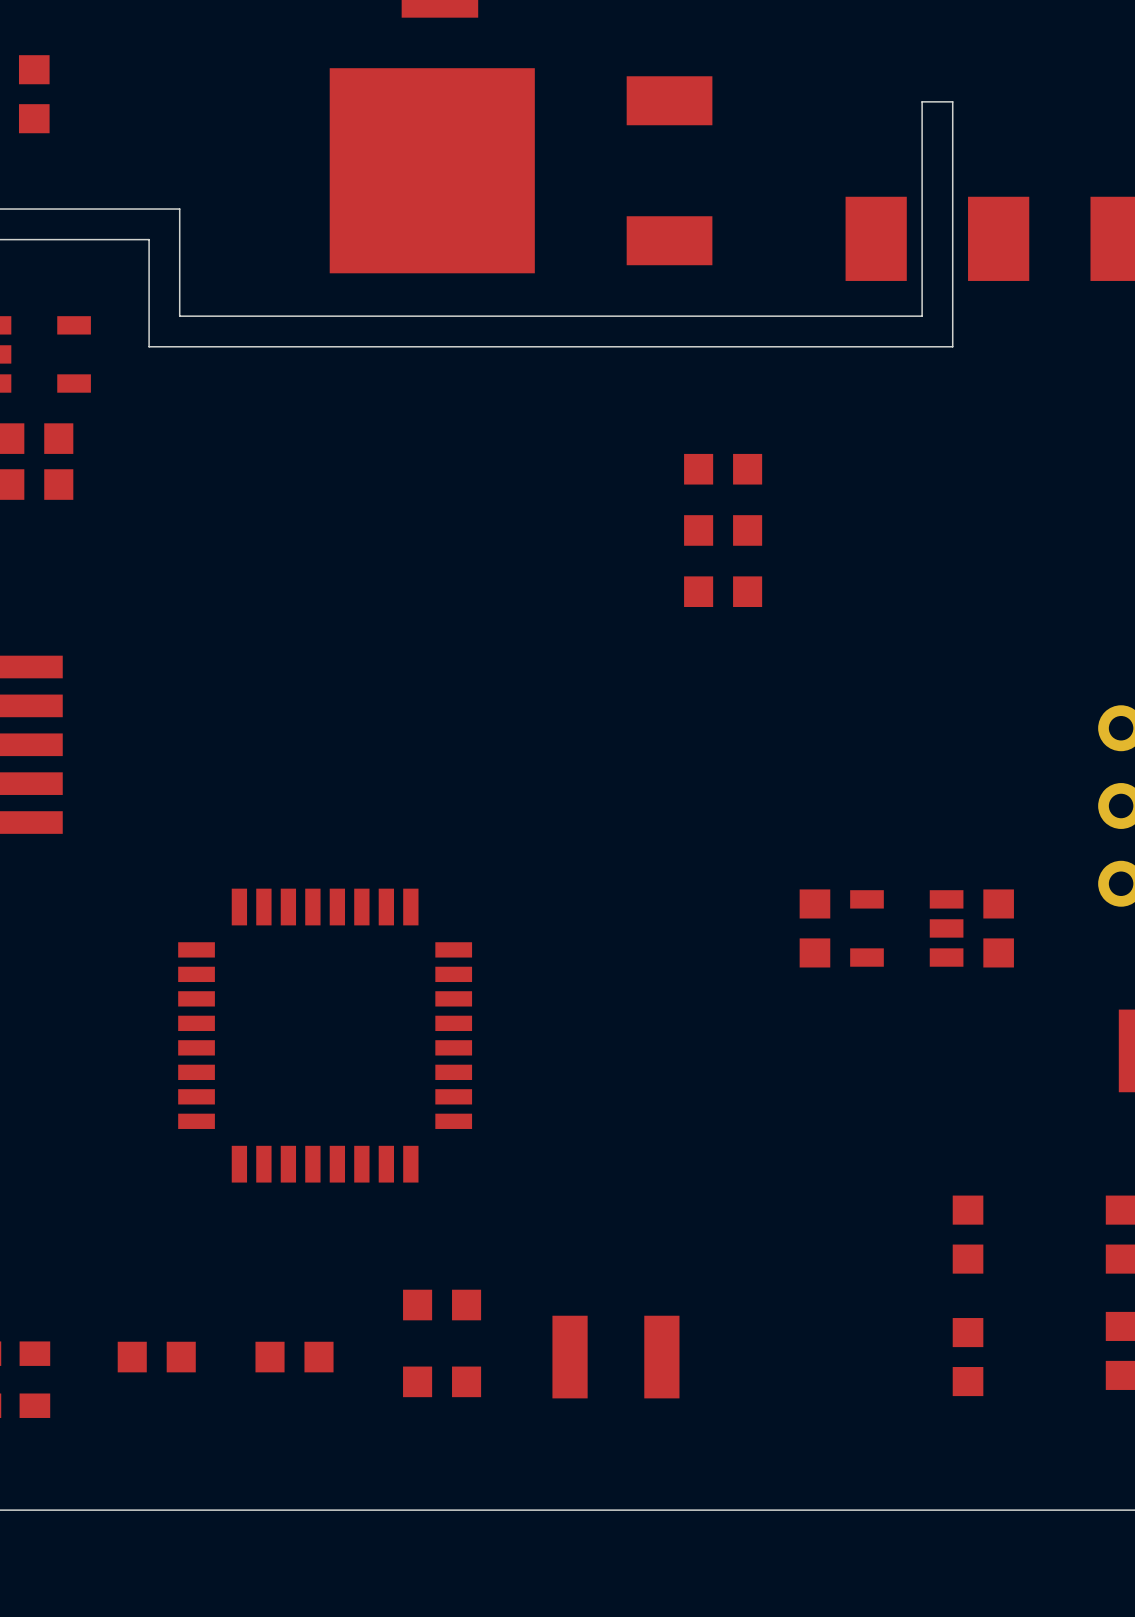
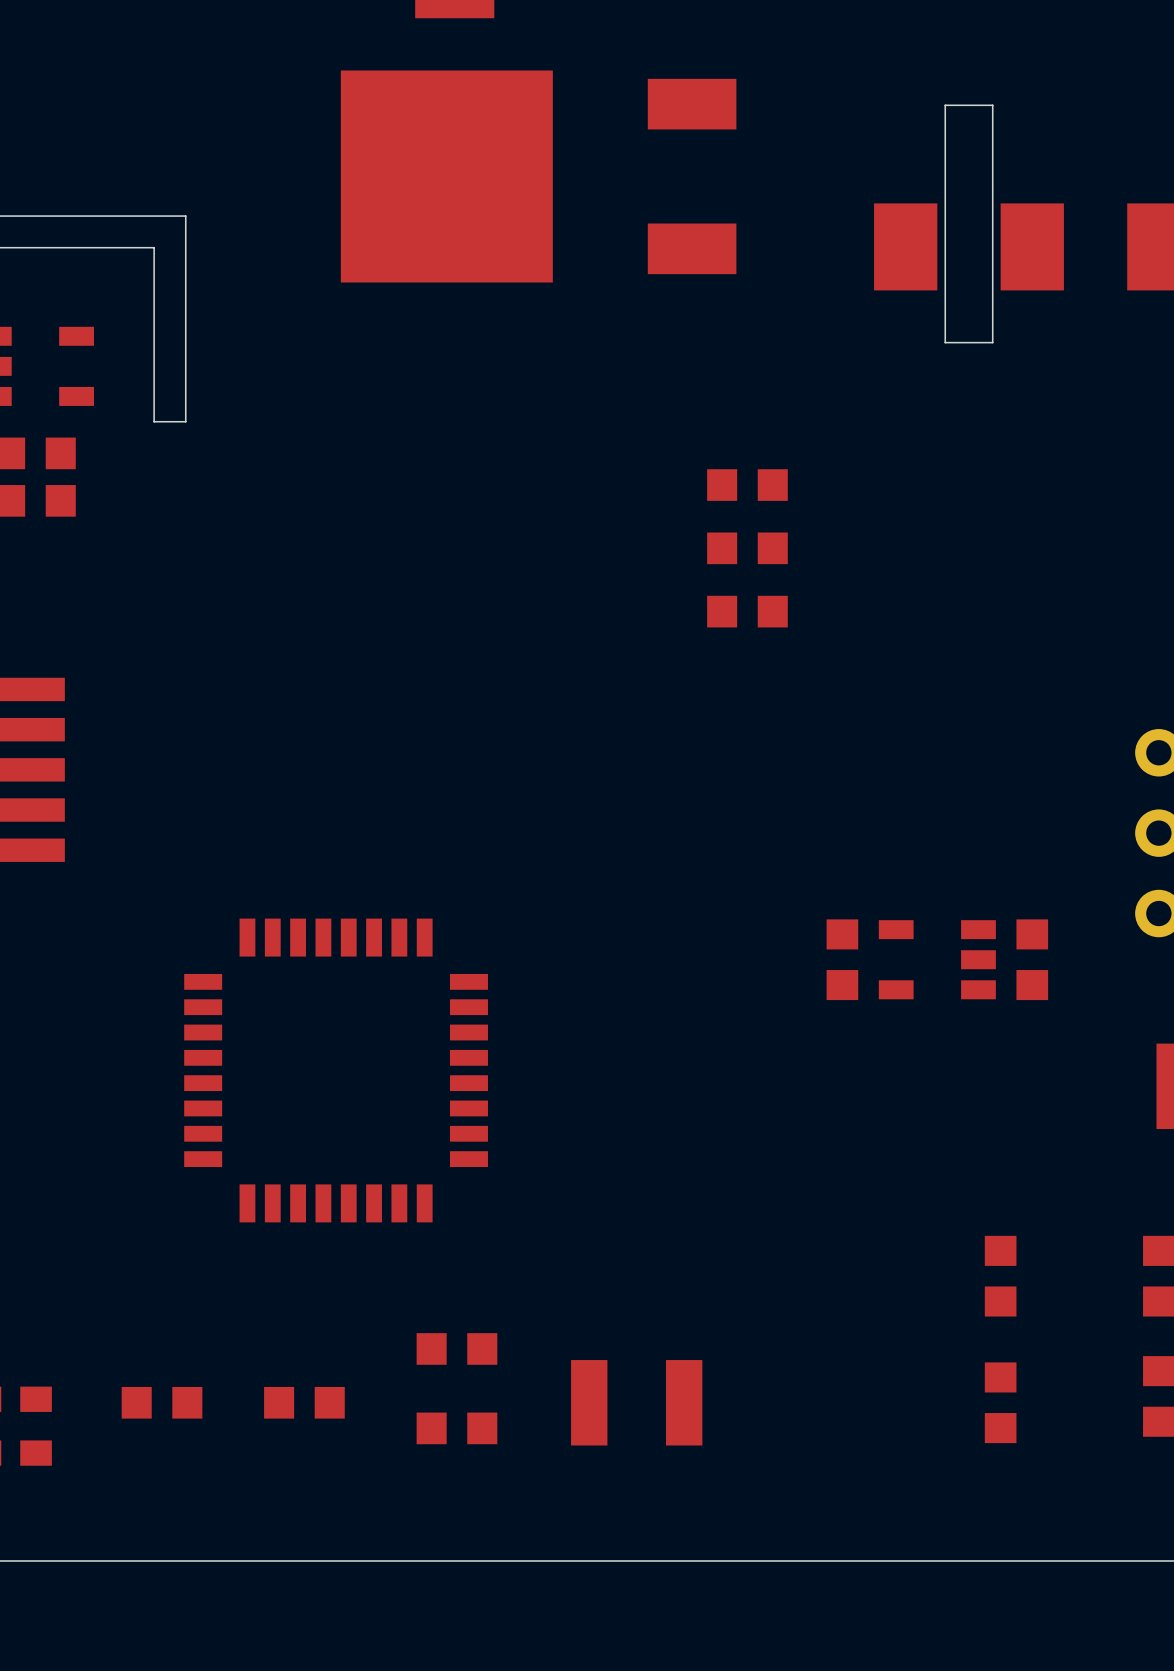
part: (34, 94) -> none
board edge: (922, 101) (922, 316) (179, 316) -> (953, 105) (945, 105) (945, 342) (992, 342) (992, 105) (984, 105)
board edge: (952, 101) (952, 346) (149, 346) -> (185, 326) (185, 421) (154, 421) (154, 358)

